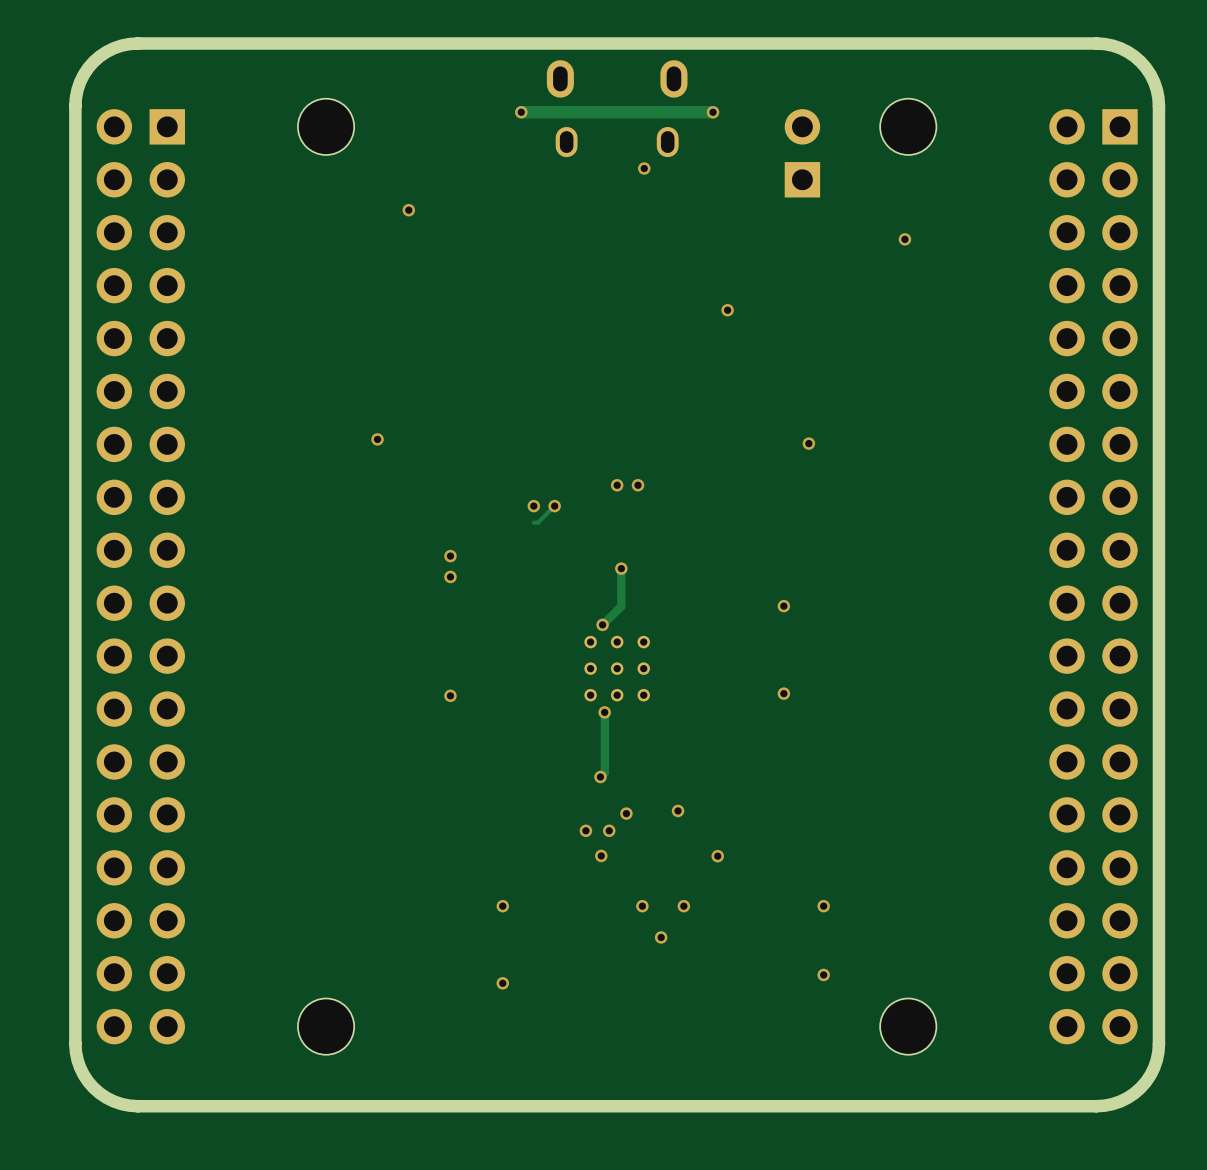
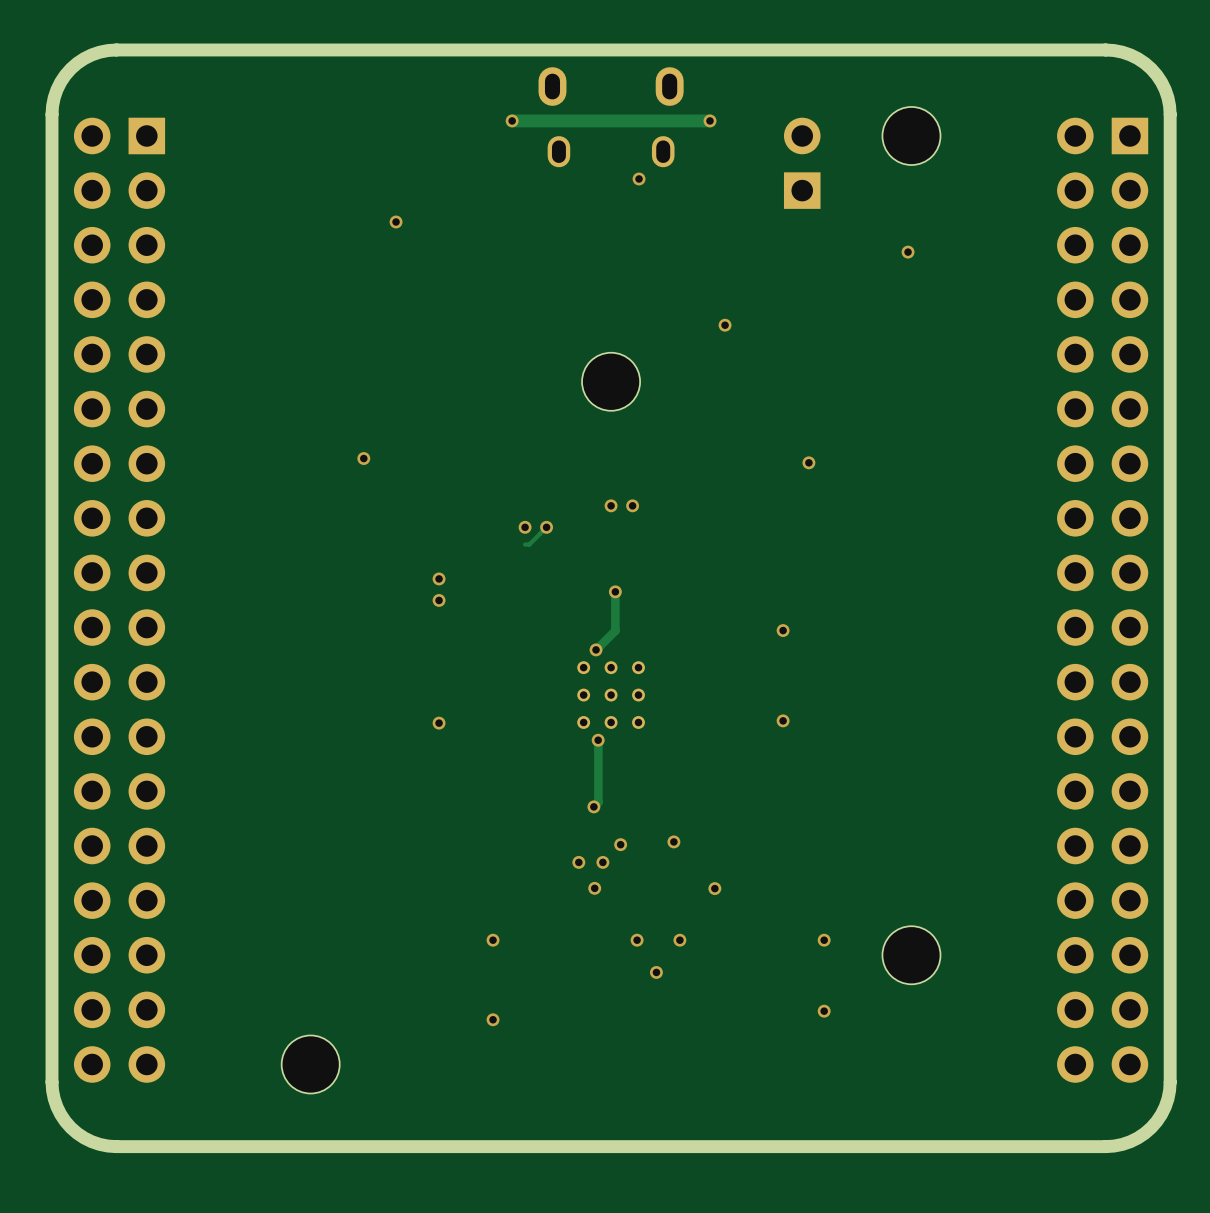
part: (326, 126) -> none
part: none -> (611, 381)
part position: (908, 1026) -> (911, 955)

